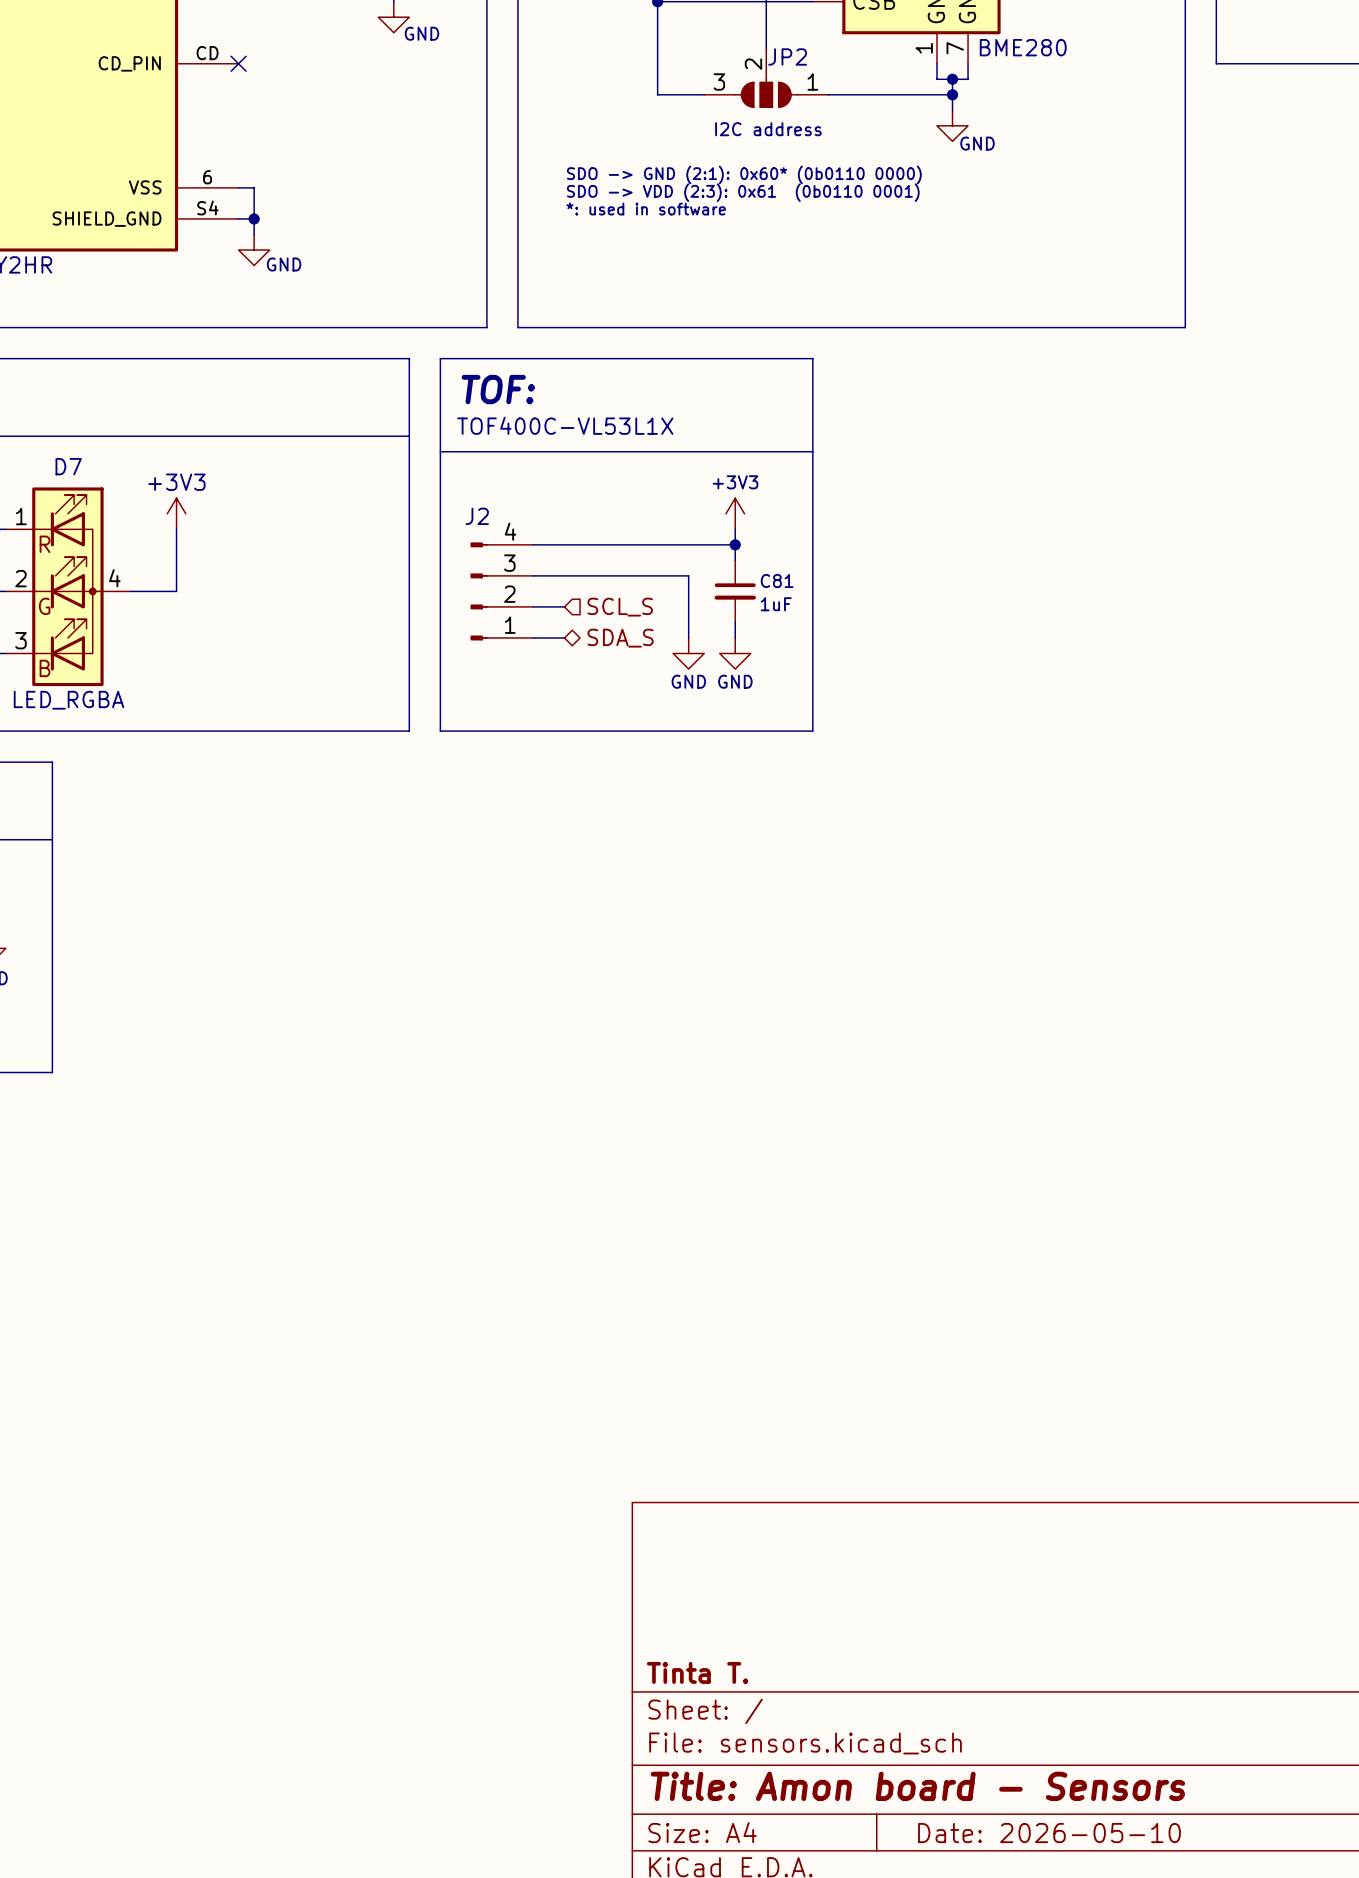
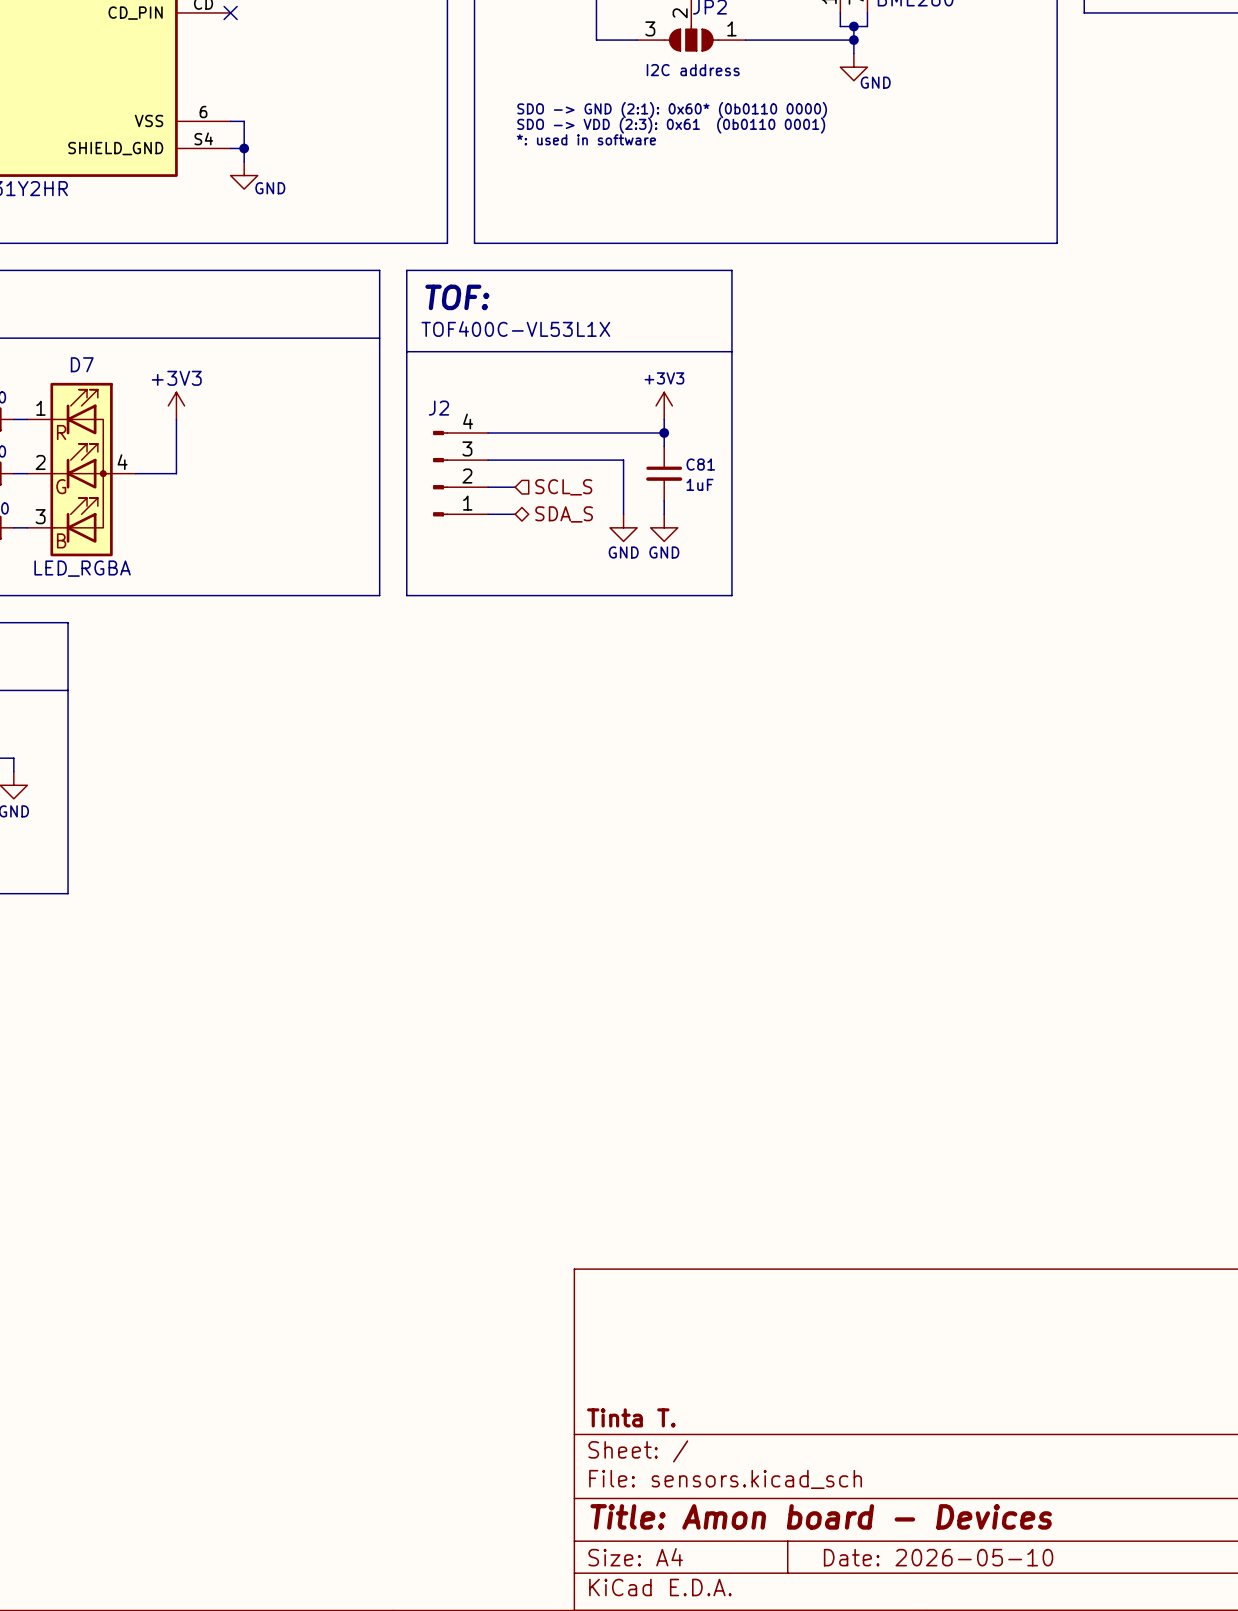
title block: Title: Amon board - Sensors (917, 1786) -> Title: Amon board - Devices (821, 1516)

